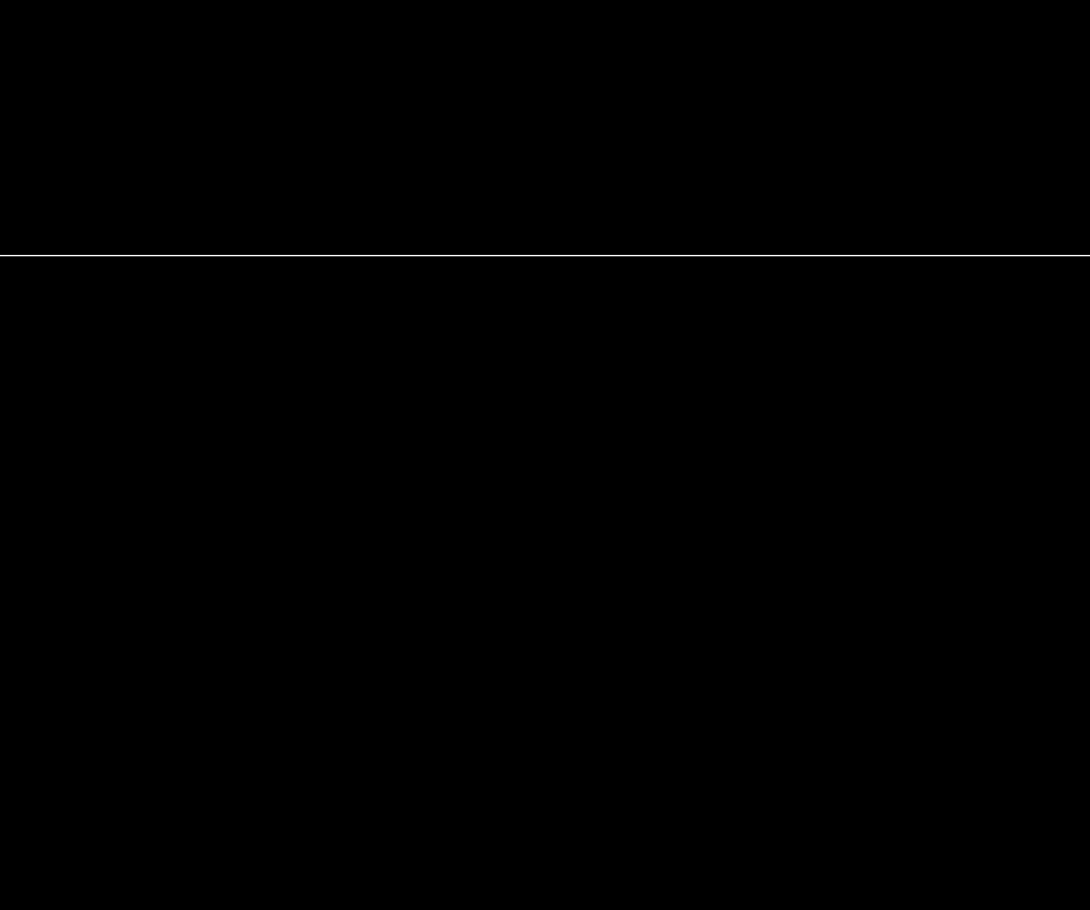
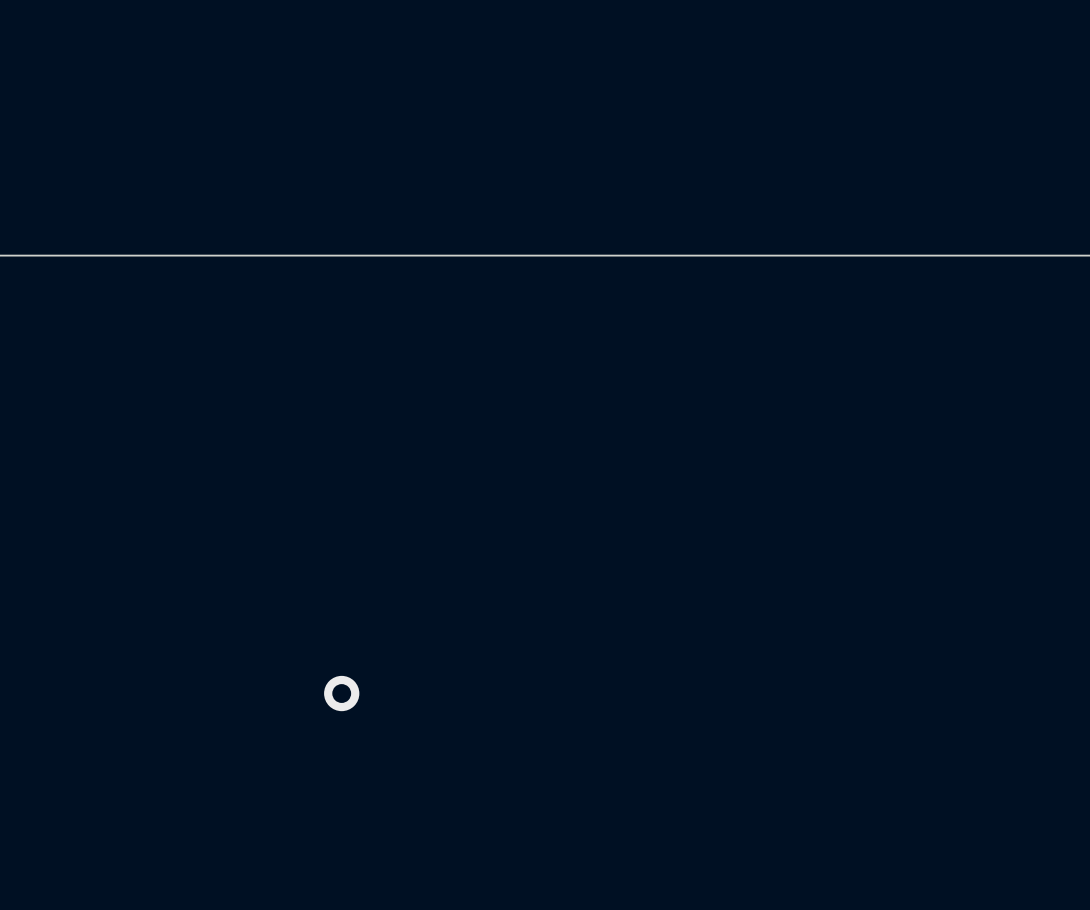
via: none -> (341, 693)

